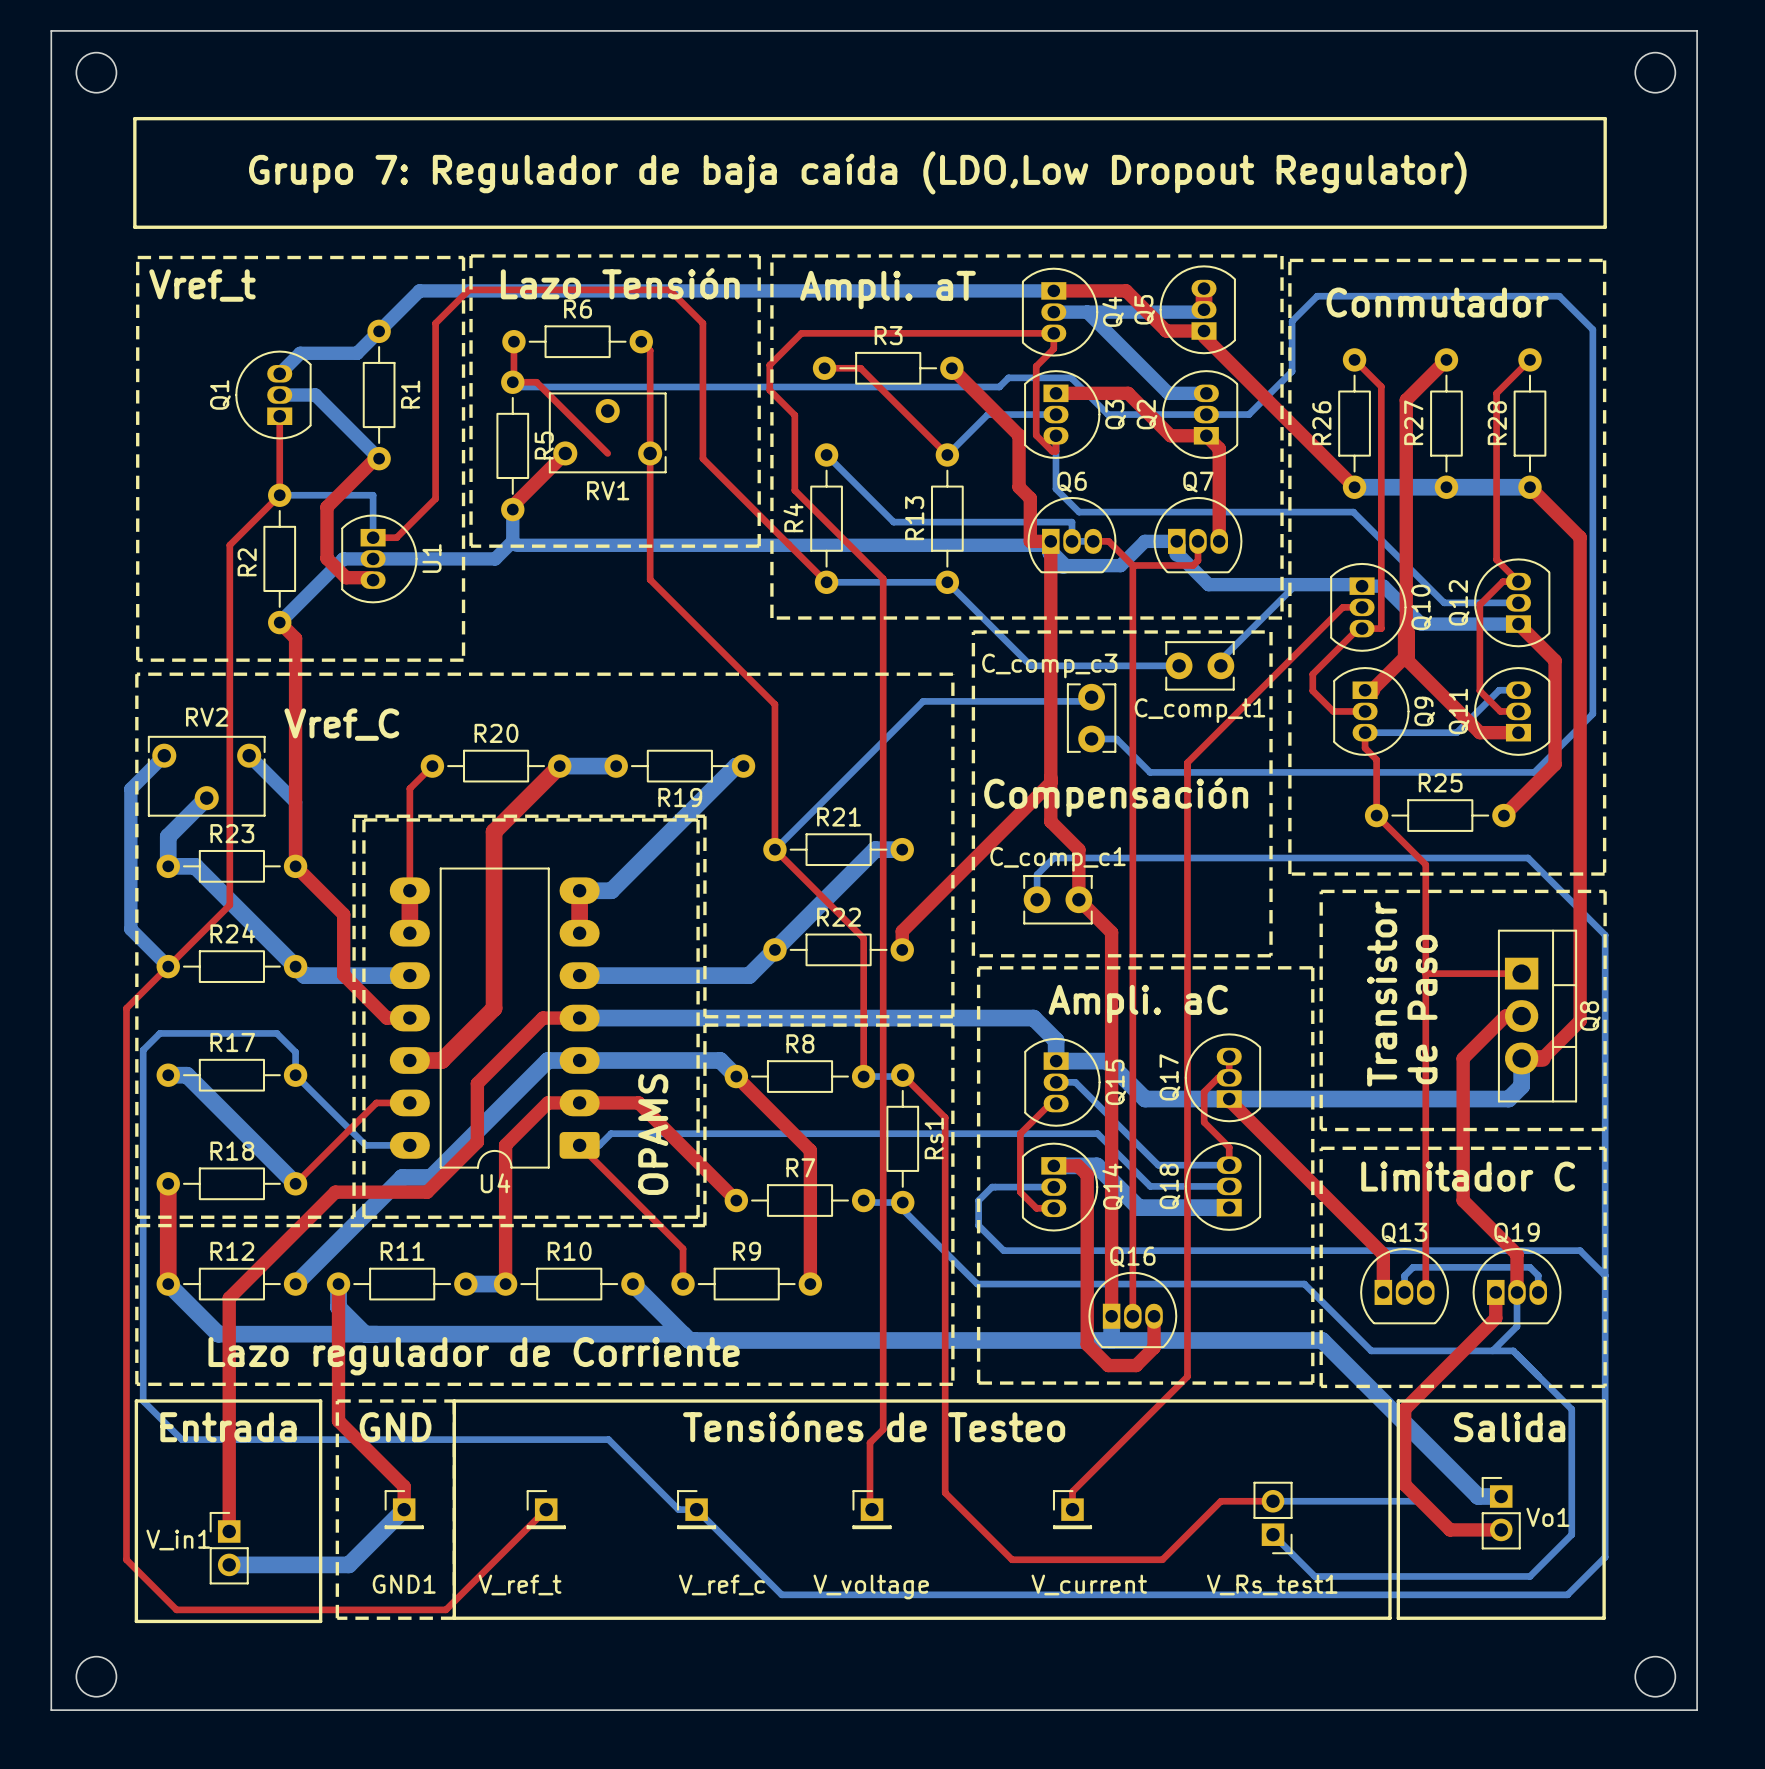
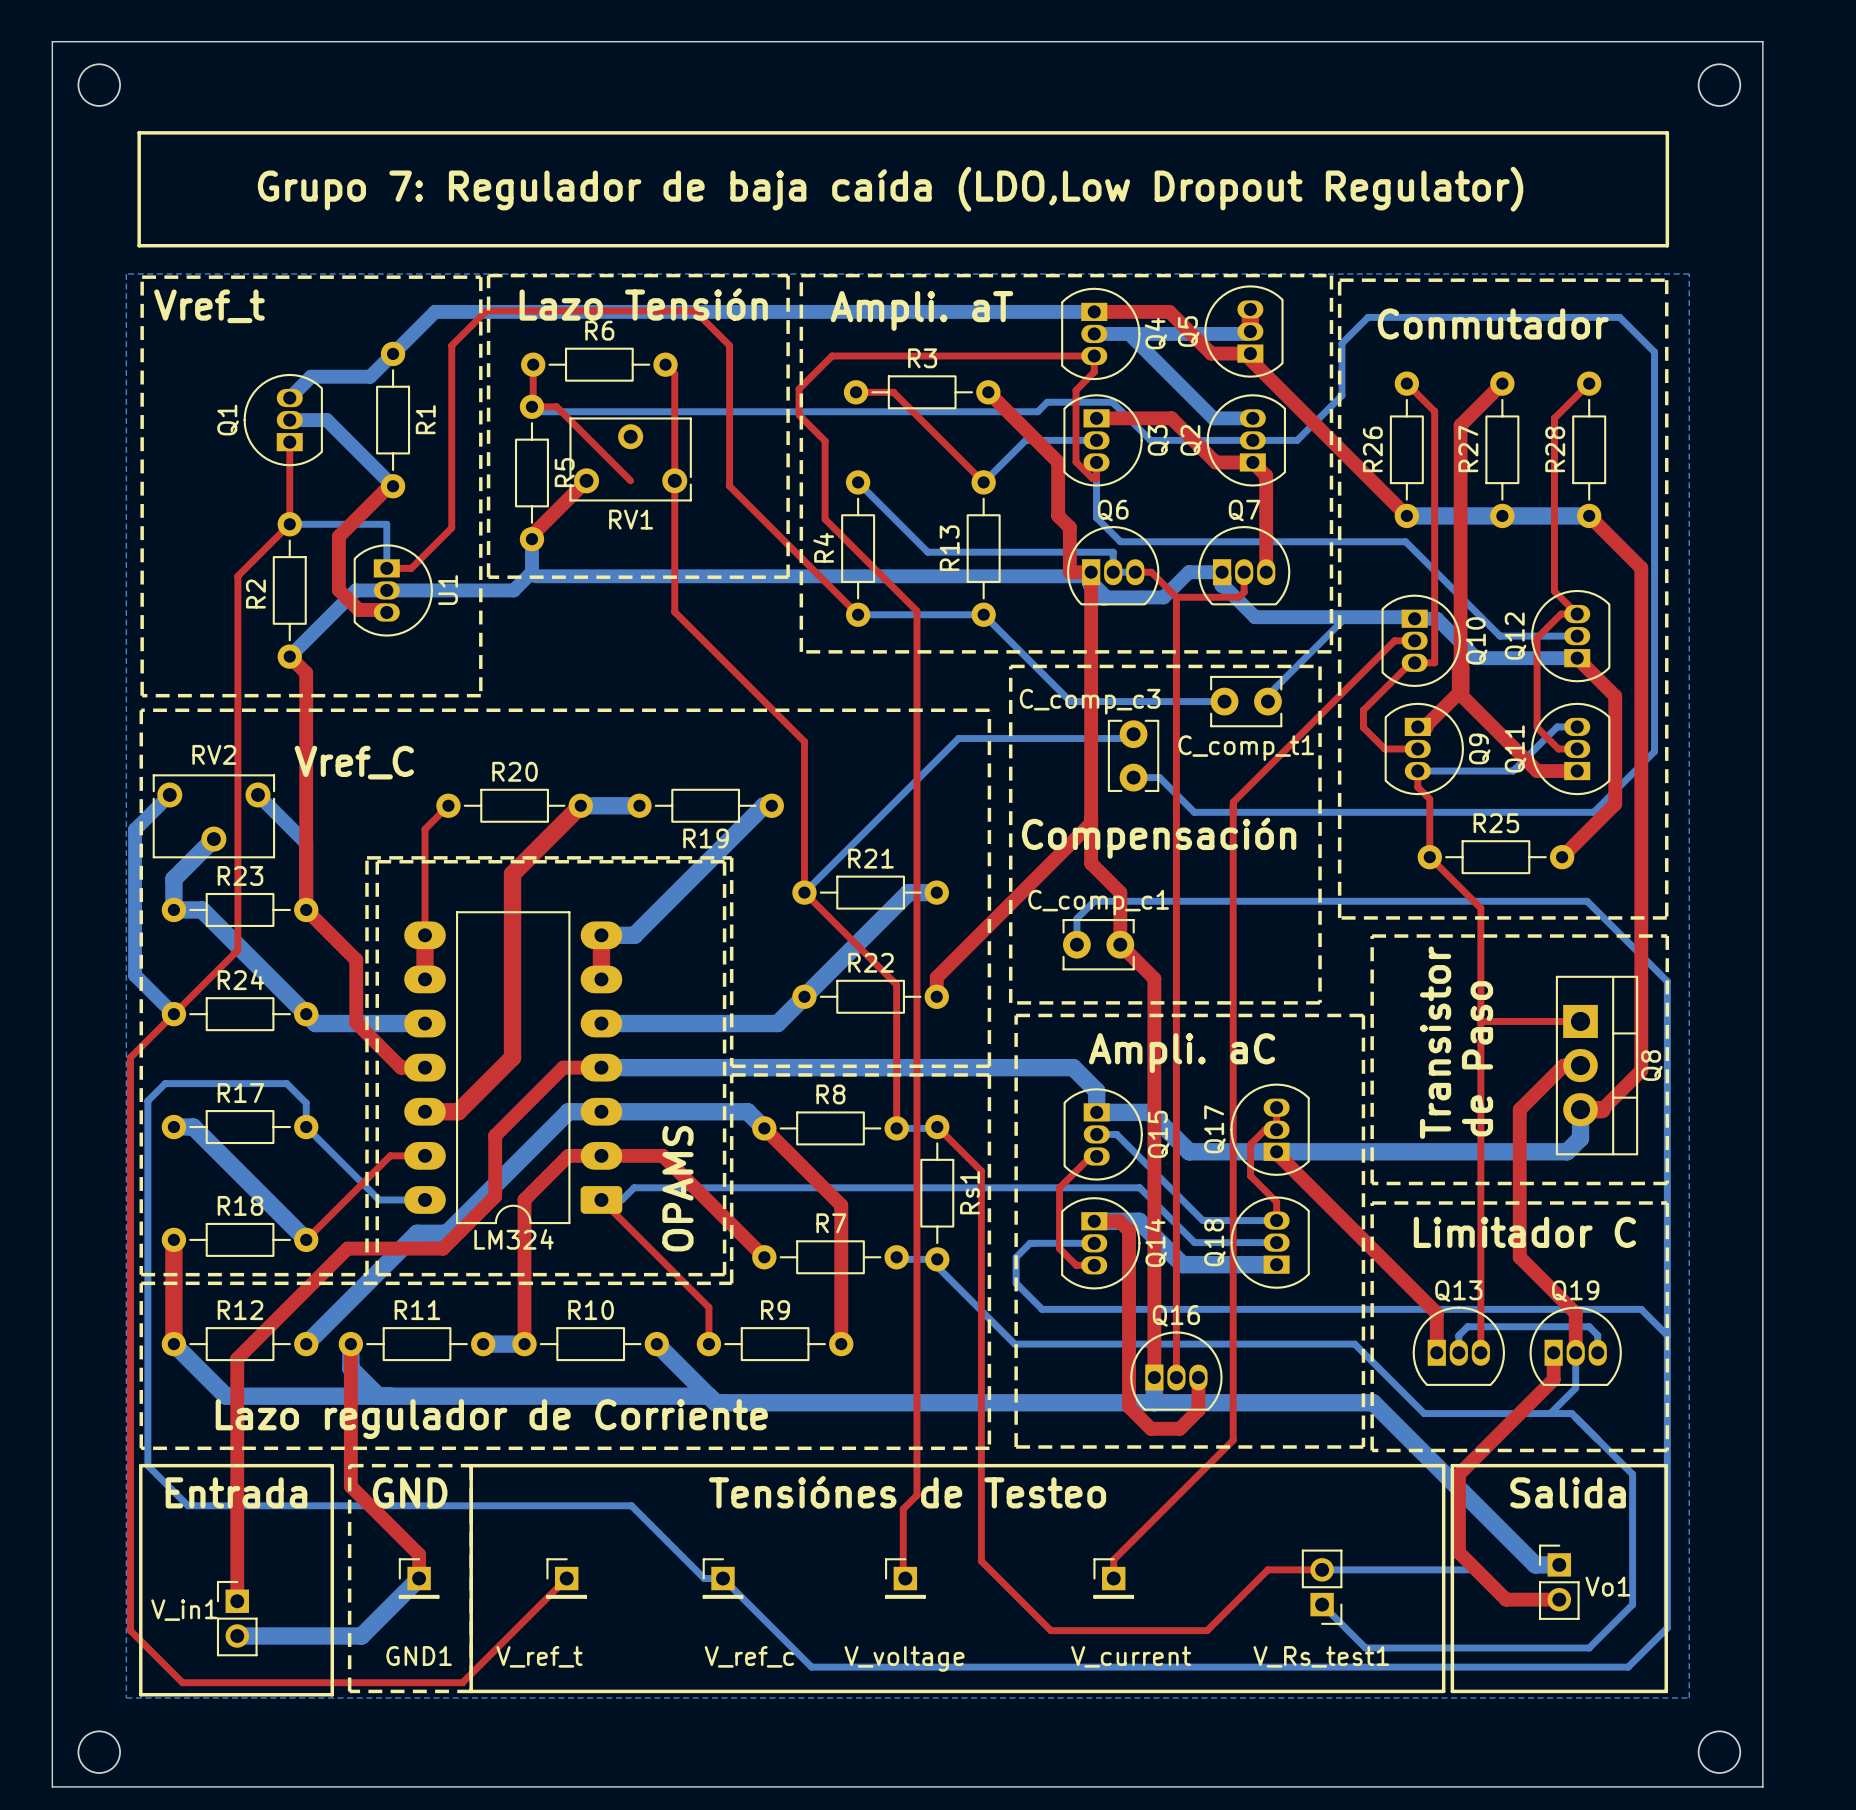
bottom zone outline: none -> (126, 274) (1689, 274) (1689, 1697) (126, 1697) (126, 274)
U4 name: U4 (495, 1183) -> LM324 (514, 1239)

